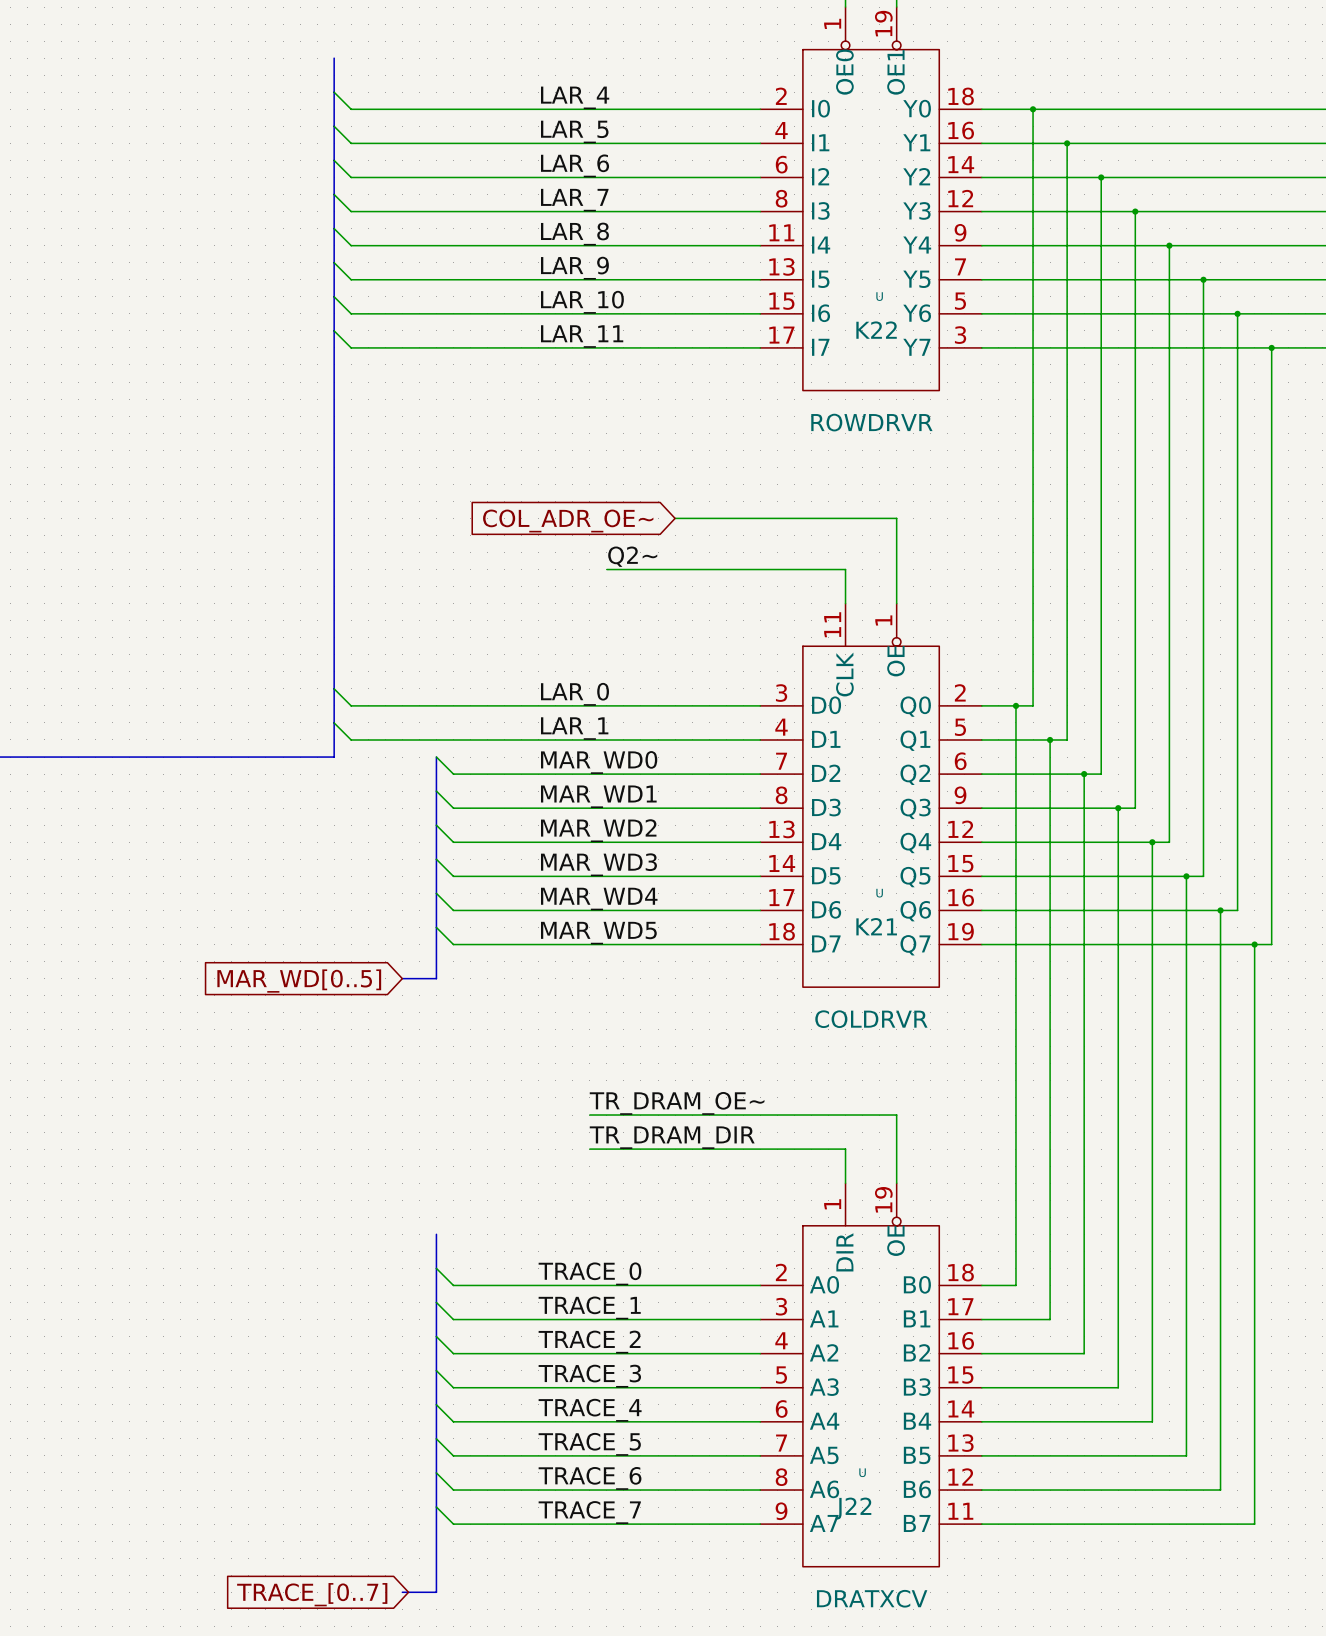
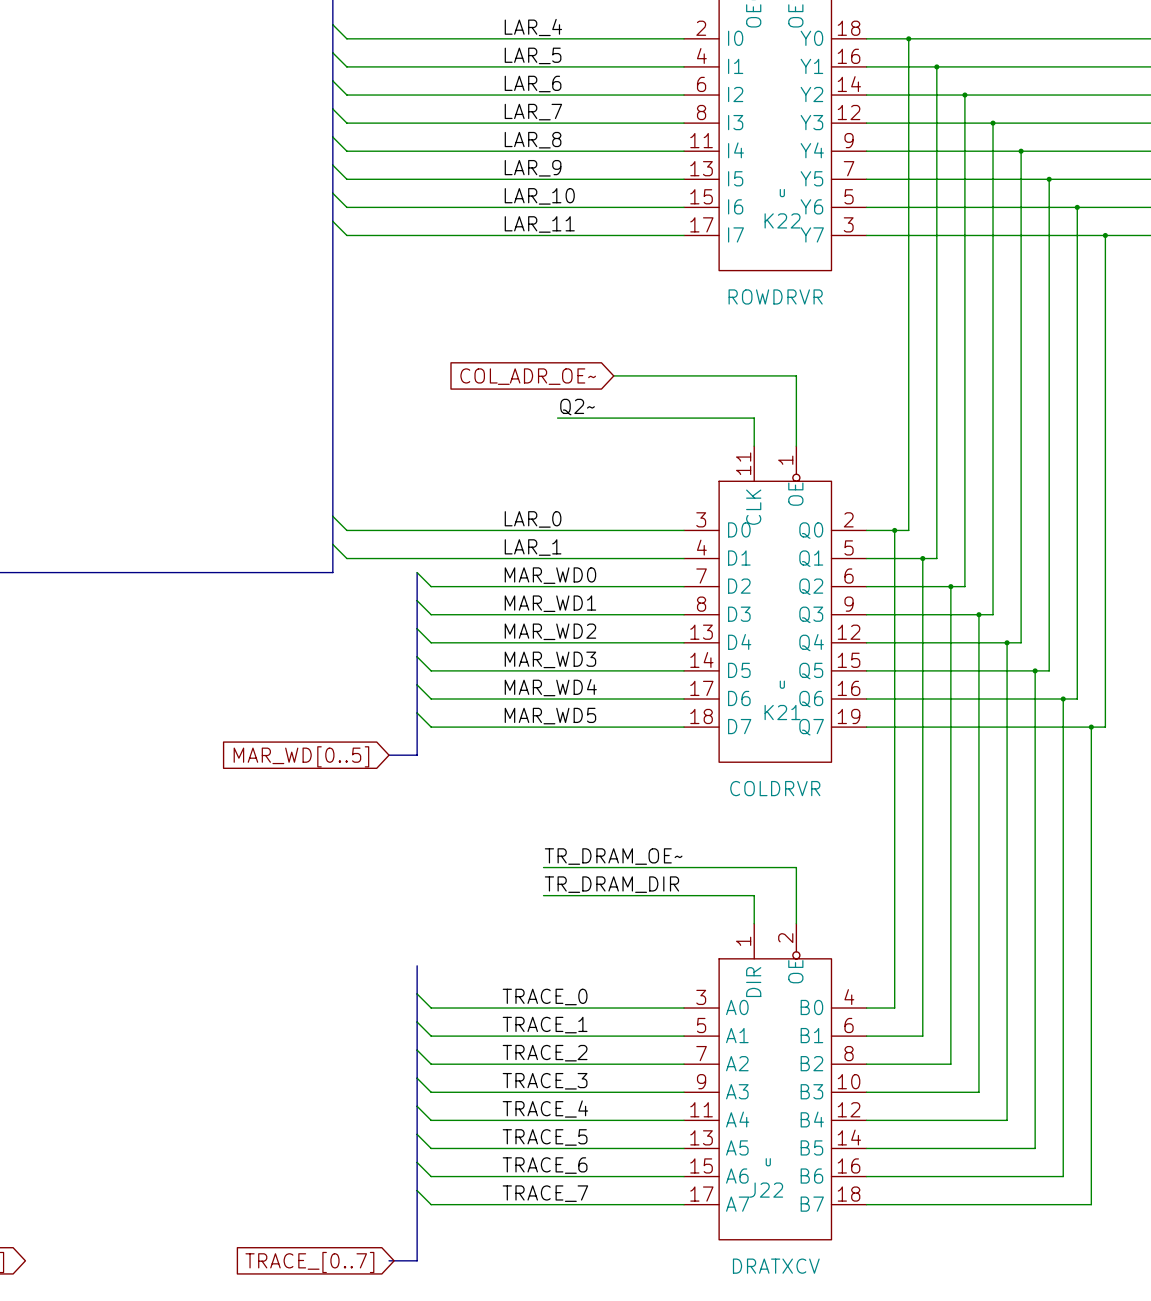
U symbol: [760, 1183, 982, 1567] -> [684, 923, 867, 1240]

